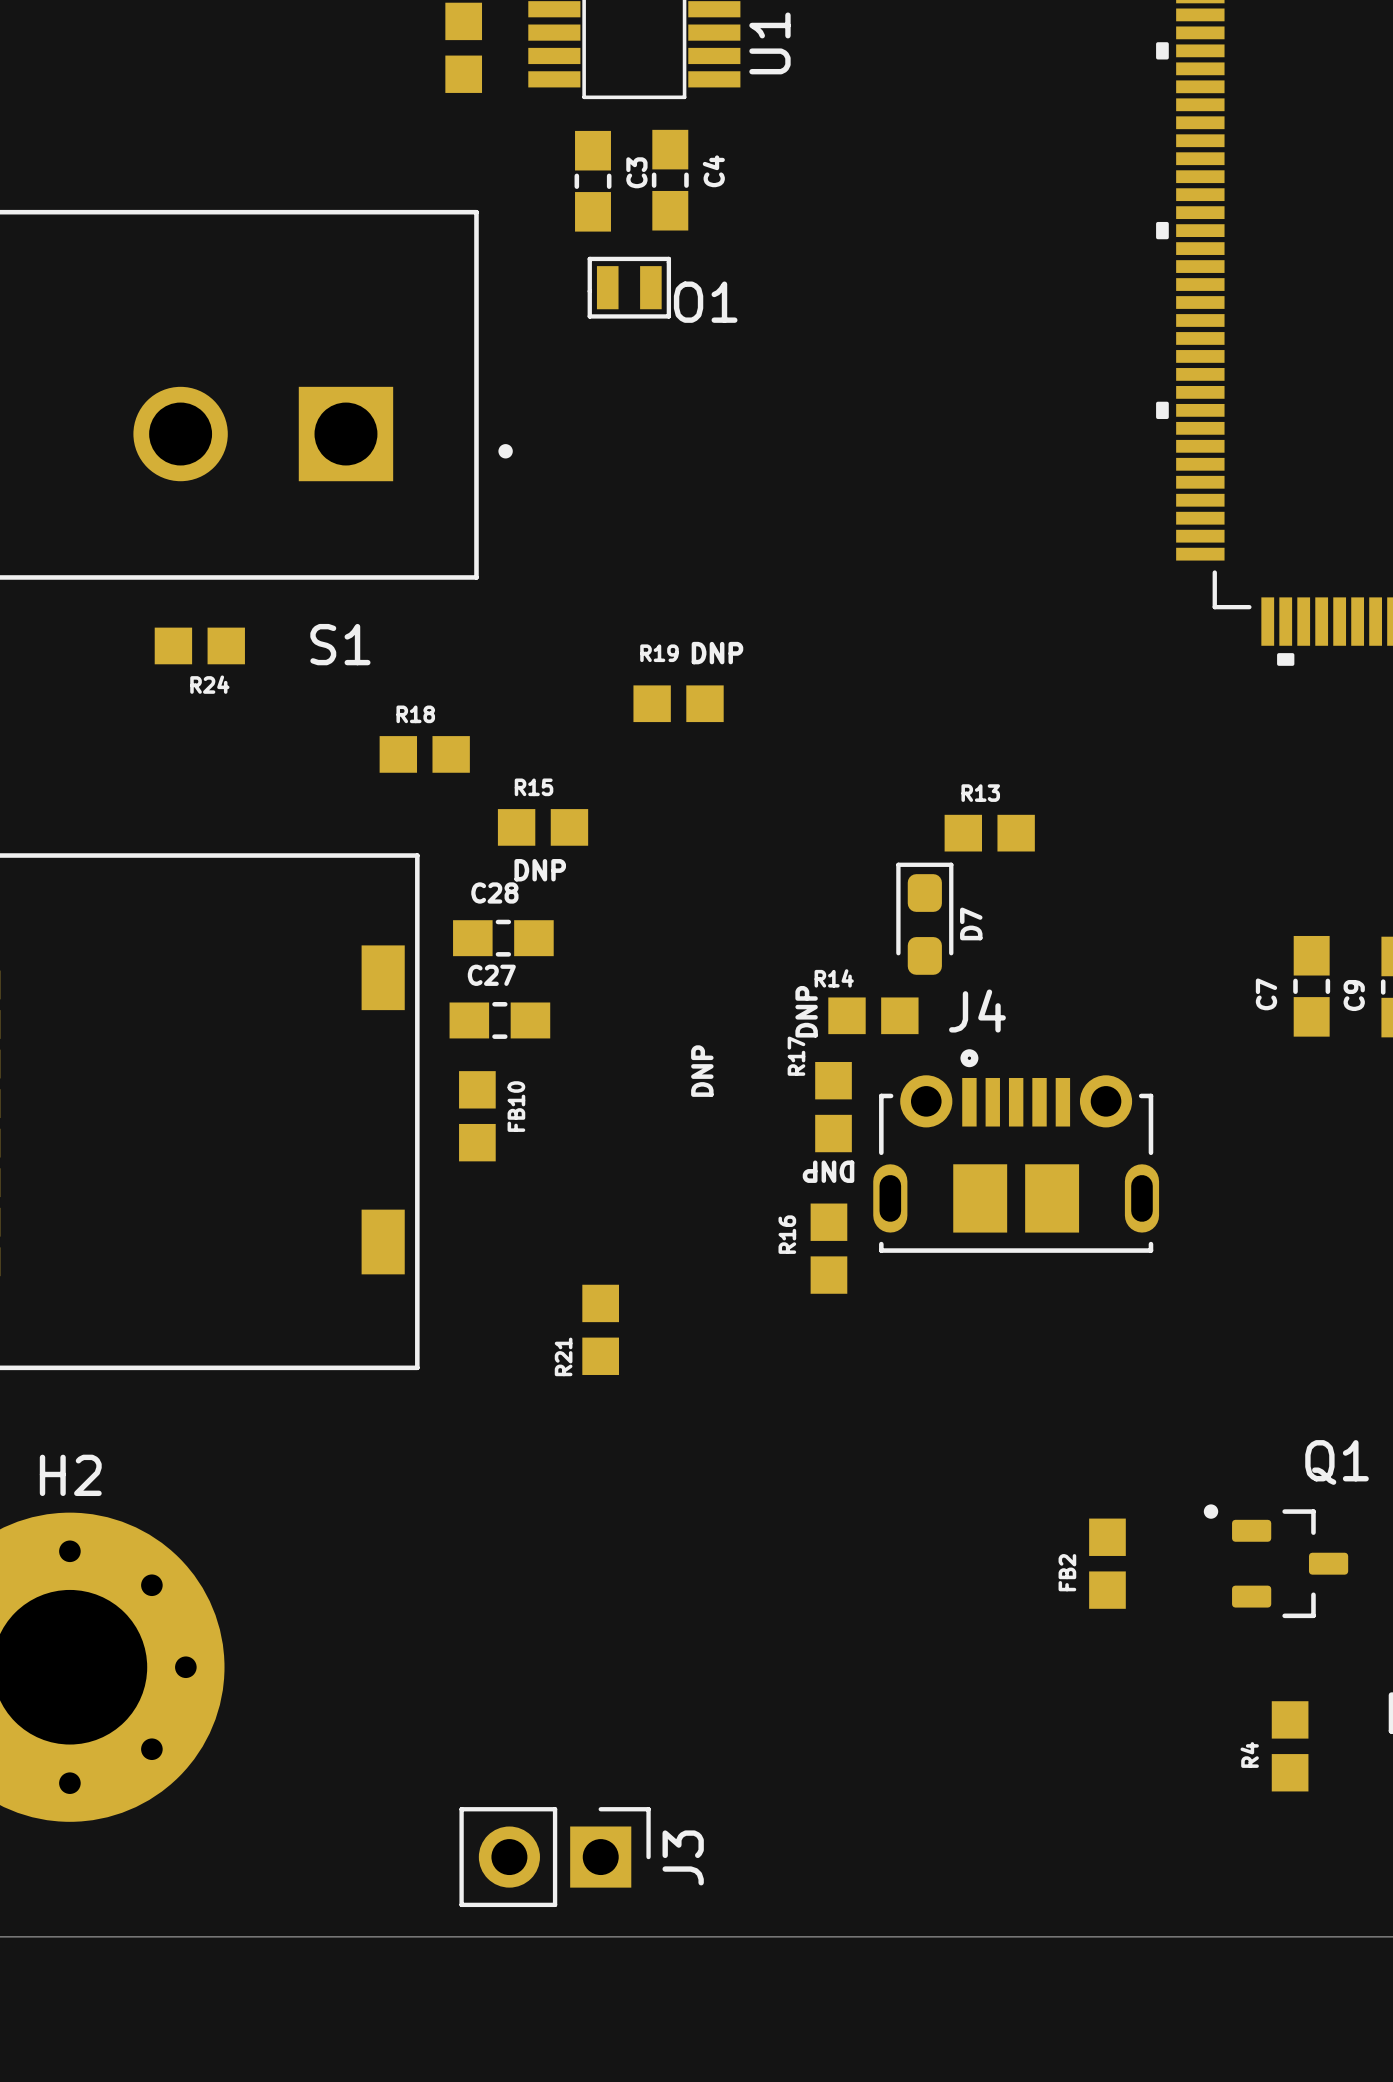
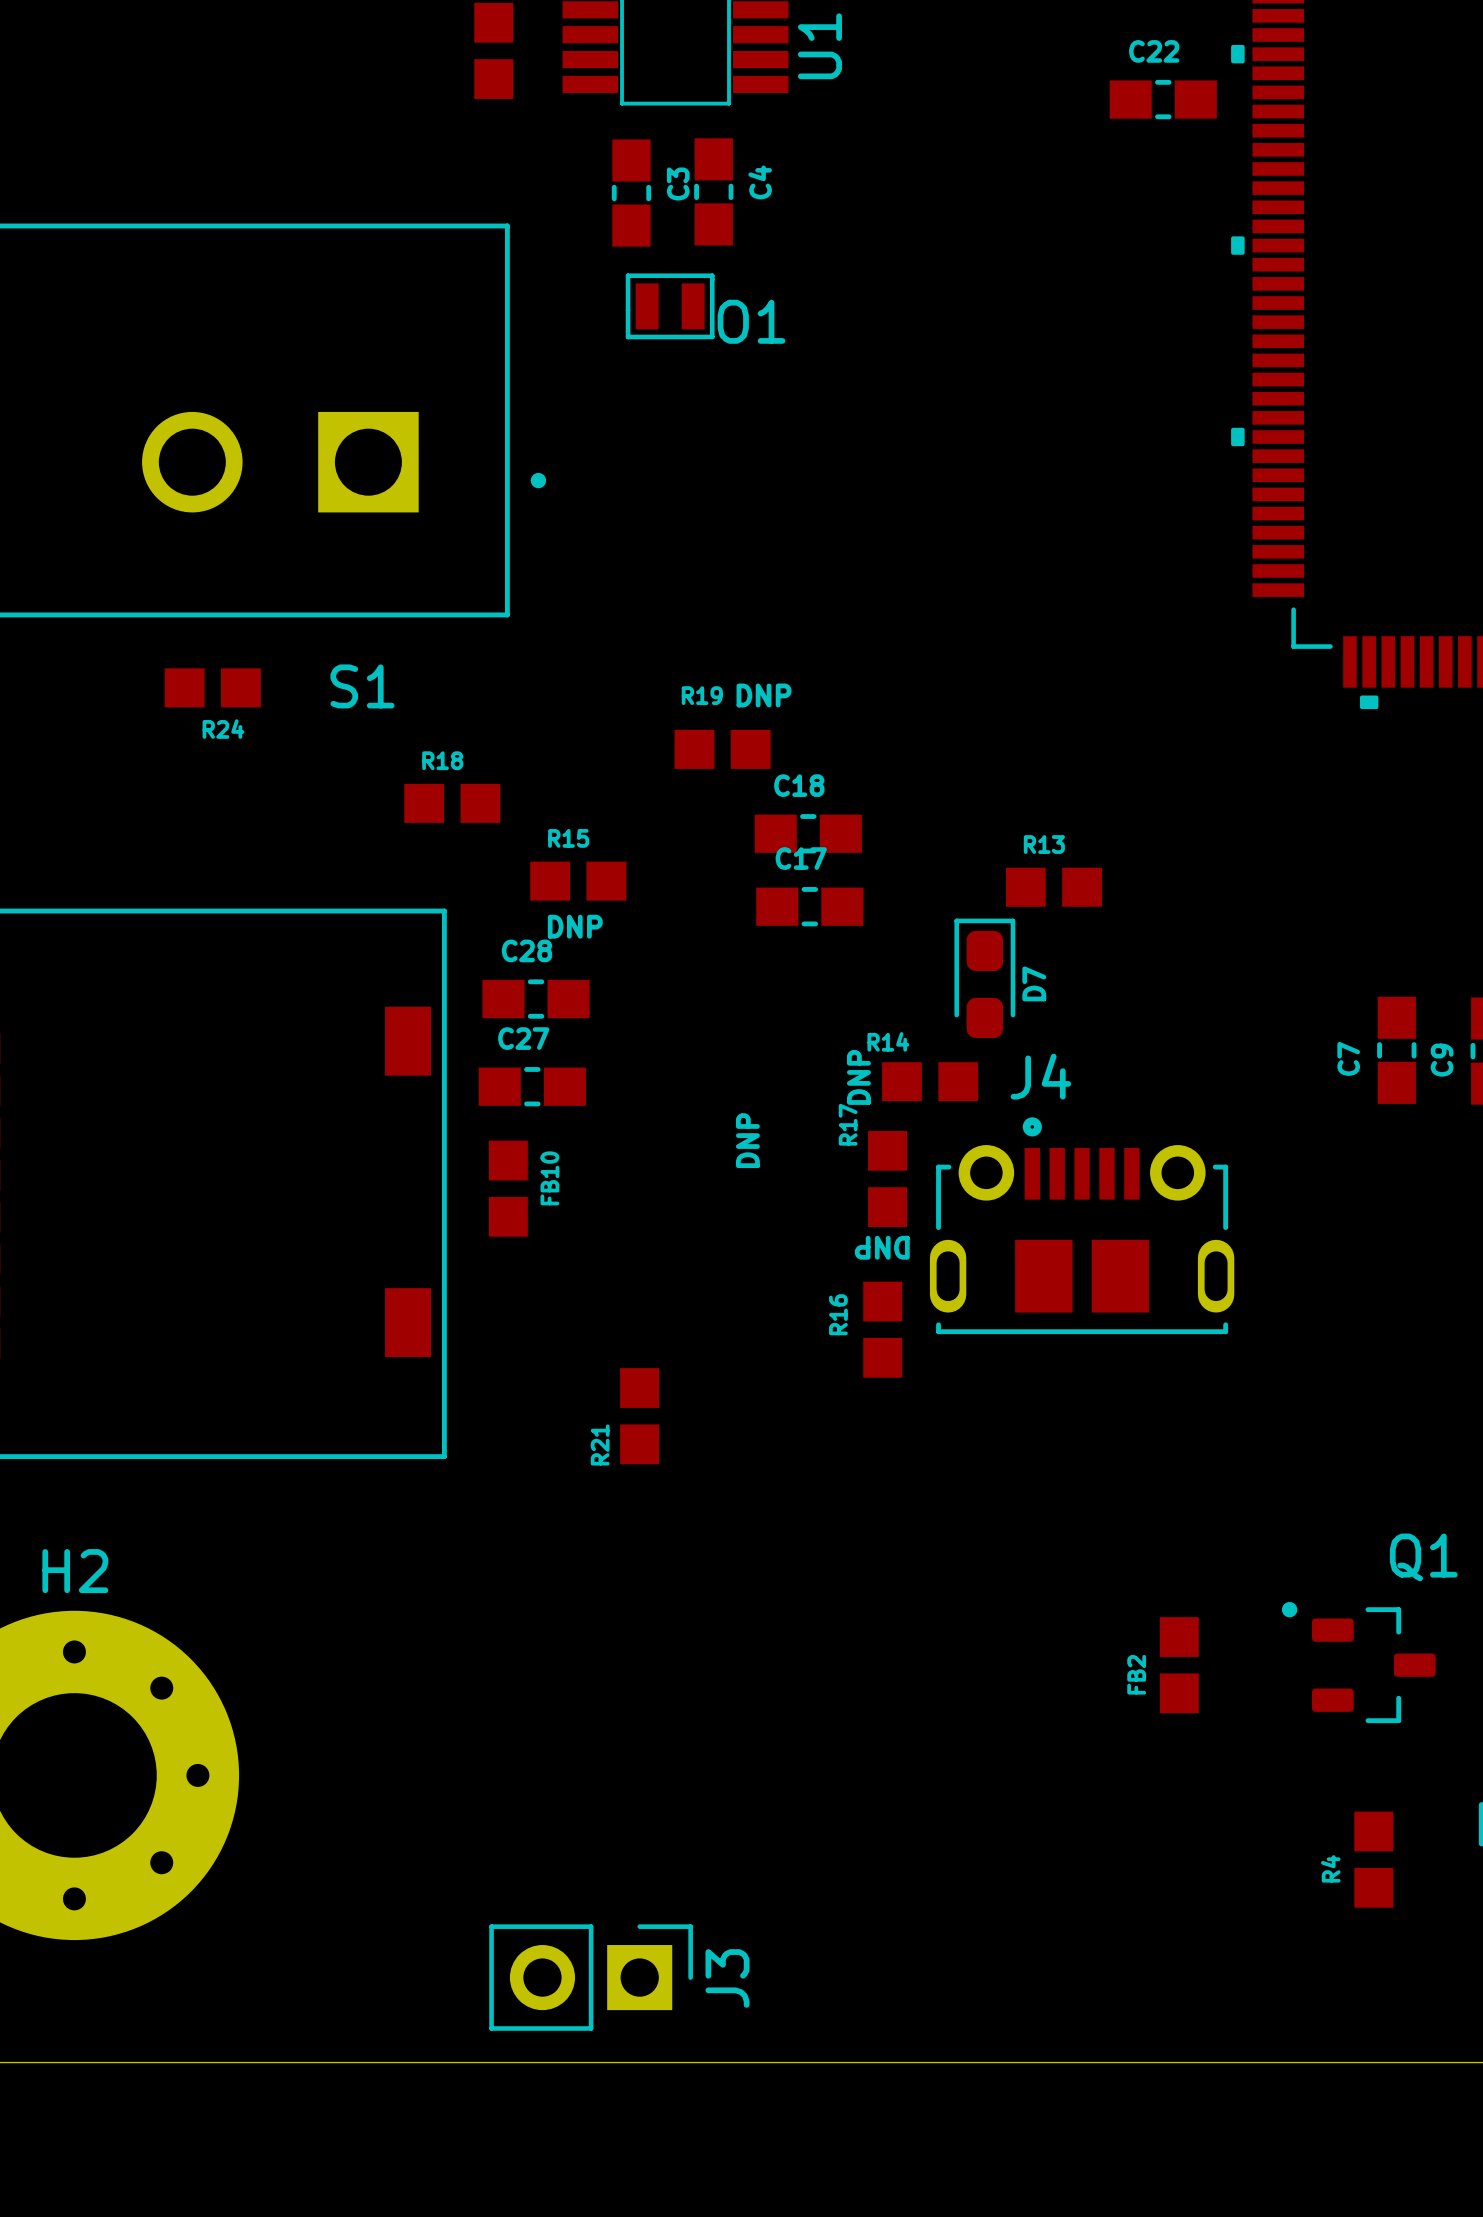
C22: none -> (1163, 99)
C18: none -> (808, 833)
C17: none -> (809, 906)

